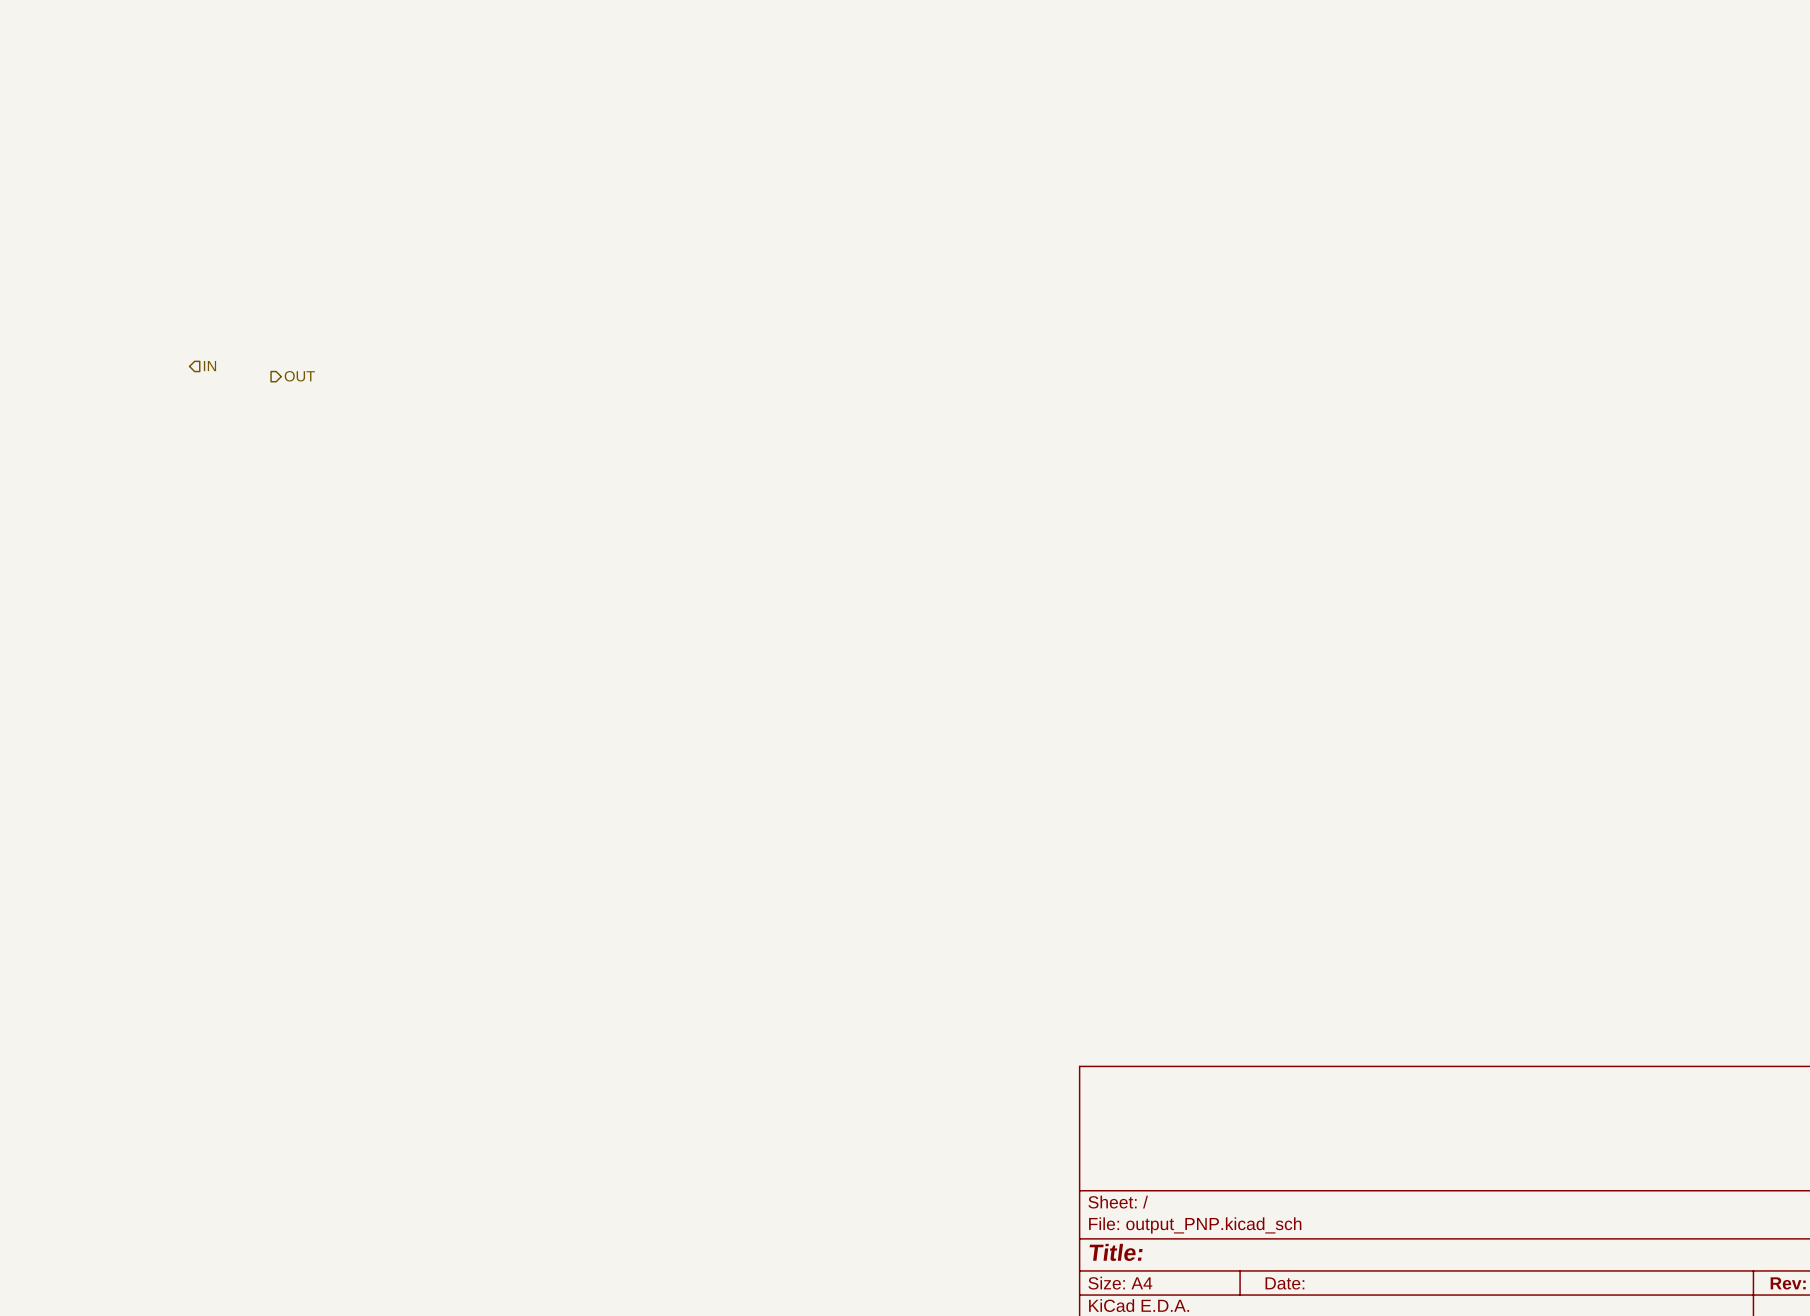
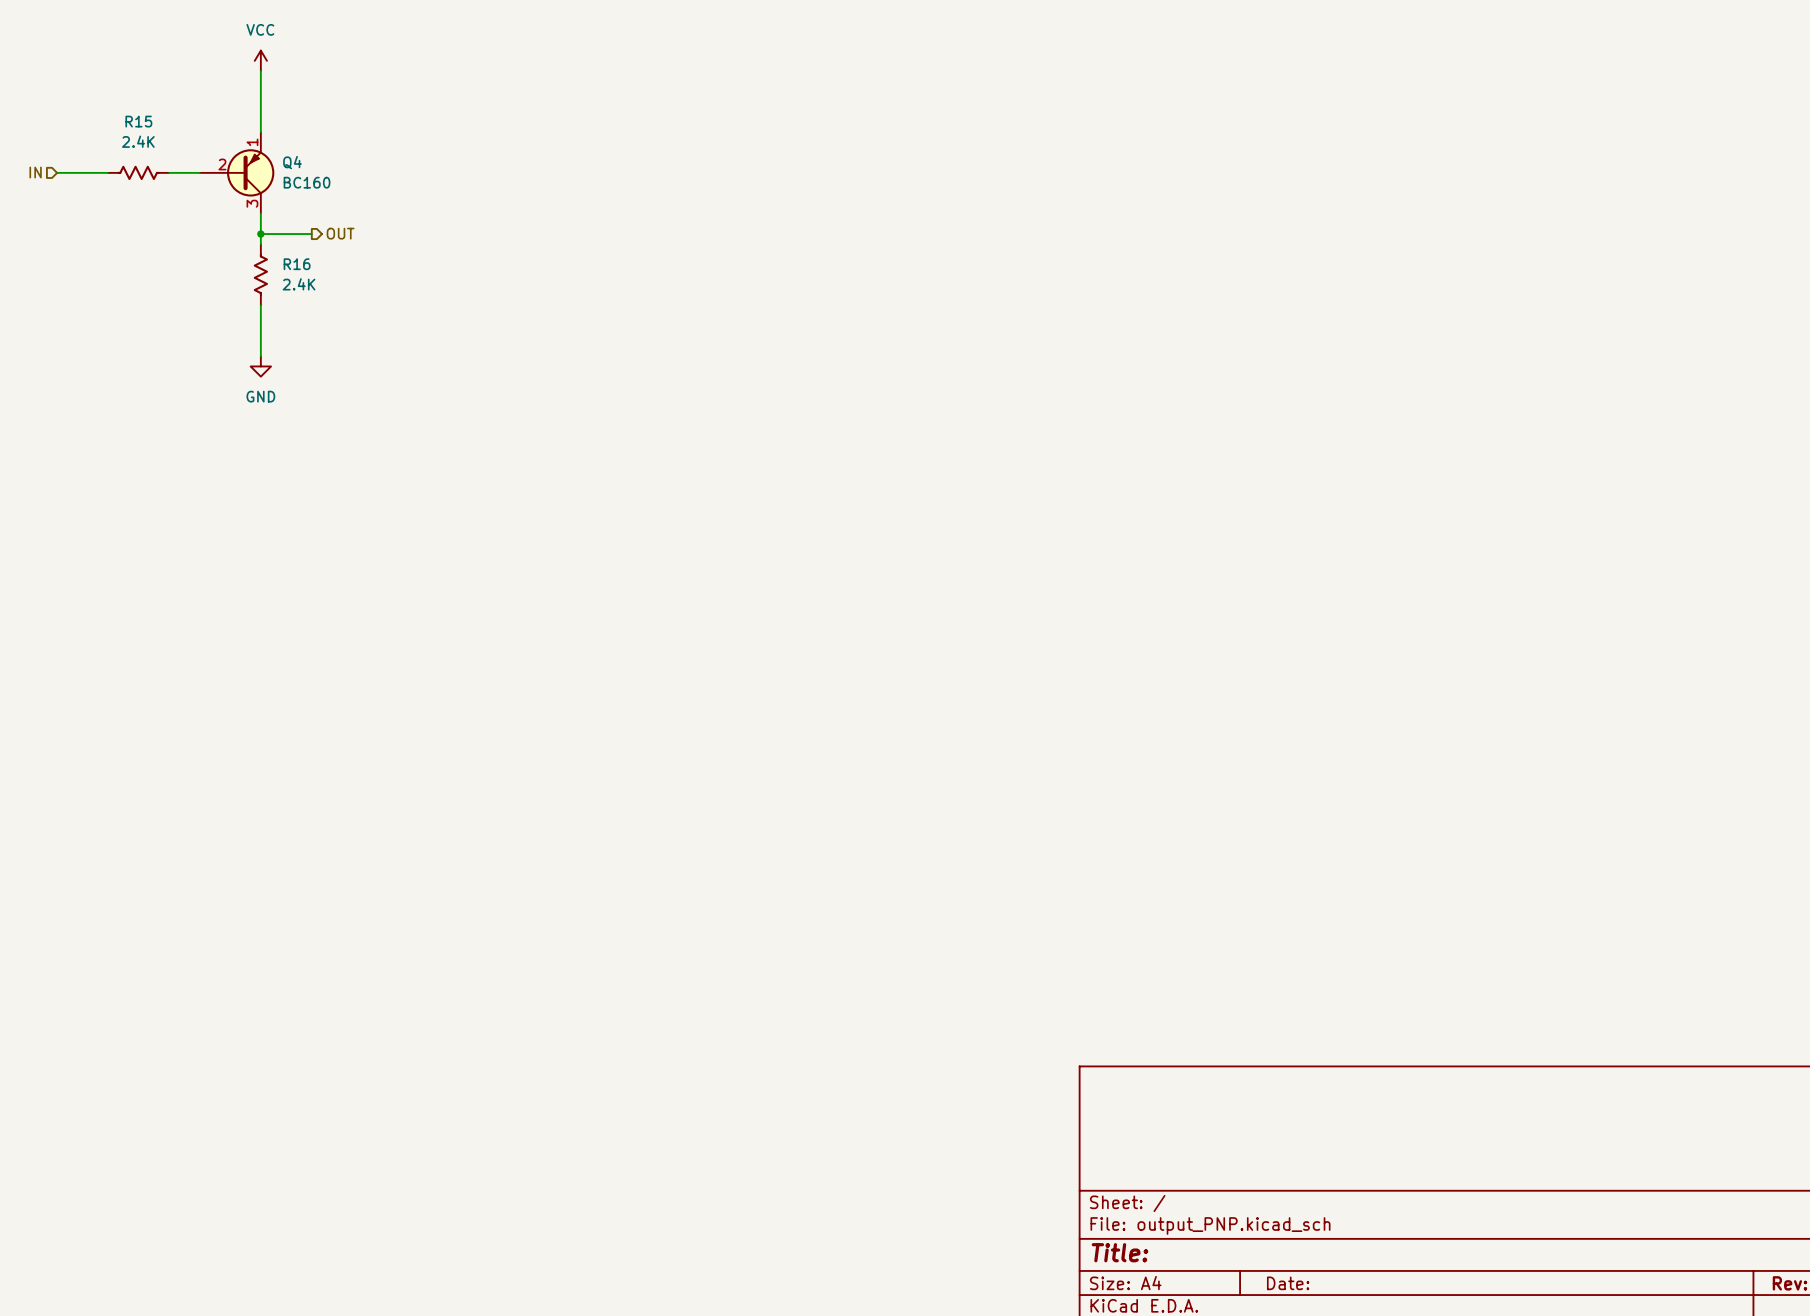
power symbol: none -> VCC (260, 60)
wire: none -> (260, 71) (260, 132)
hierarchical label: none -> IN (35, 172)
wire: none -> (57, 172) (108, 172)
R15: none -> 2.4K (138, 172)
wire: none -> (169, 172) (199, 172)
Q4: none -> BC160 (237, 172)
wire: none -> (260, 213) (260, 244)
wire: none -> (260, 234) (311, 234)
junction: none -> (260, 234)
R16: none -> 2.4K (260, 274)
wire: none -> (260, 305) (260, 356)
hierarchical label: IN (209, 366) -> none
power symbol: none -> GND (260, 366)
hierarchical label position: OUT (299, 376) -> OUT (340, 233)

